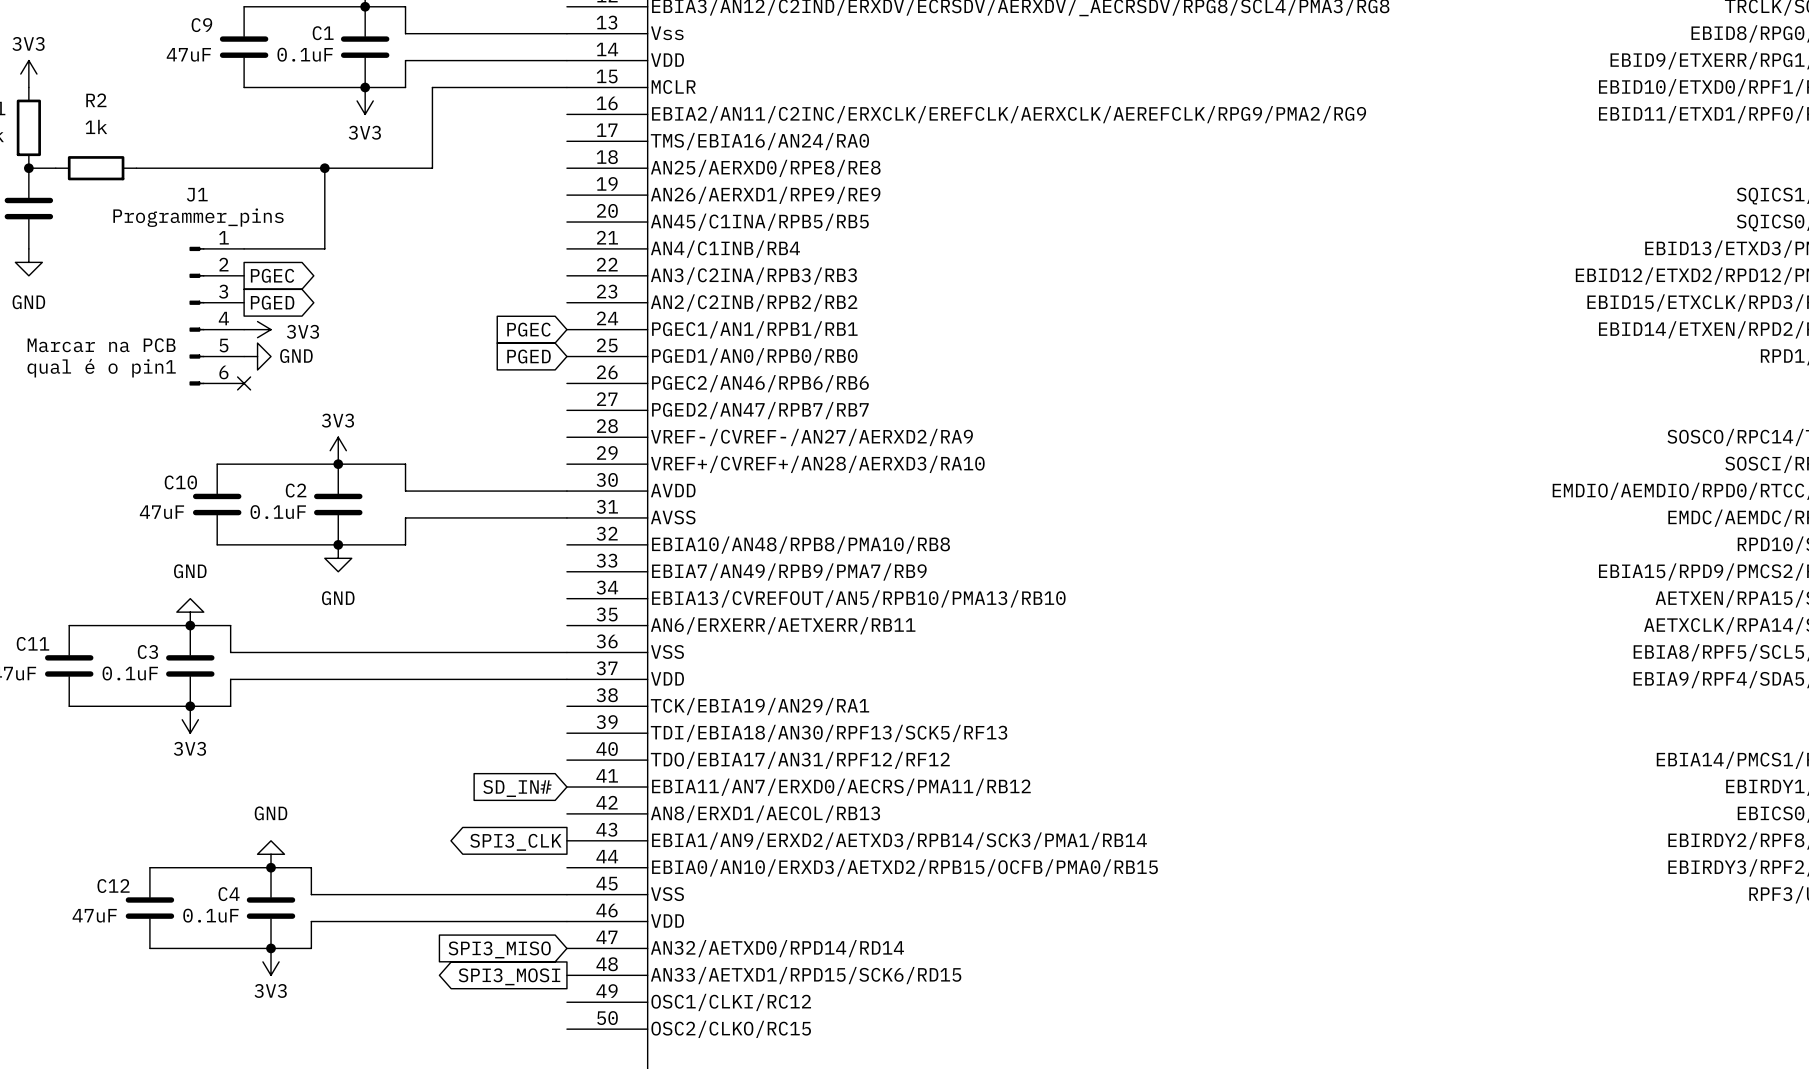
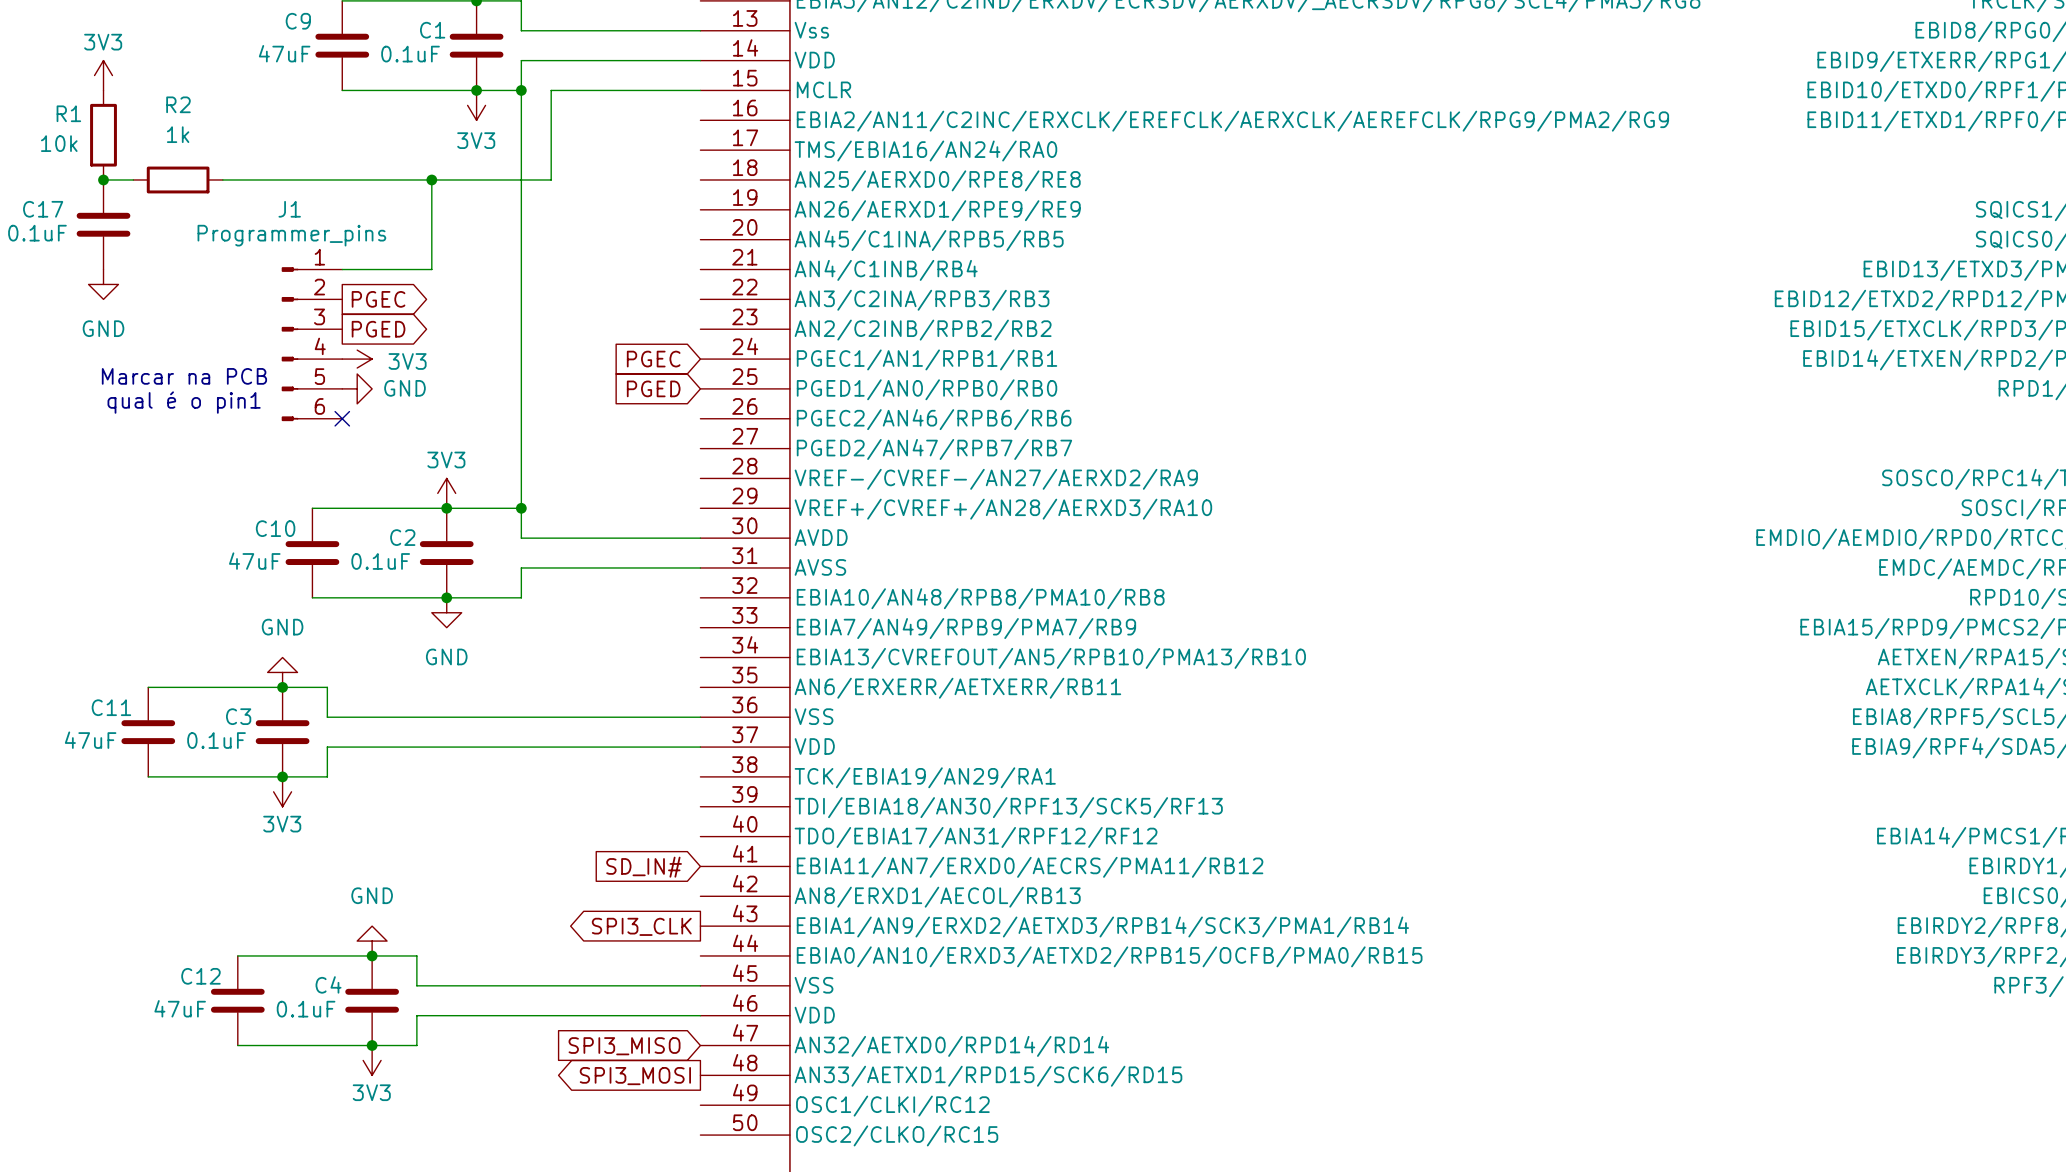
wire: none -> (521, 90) (521, 508)
junction: none -> (521, 90)
junction: none -> (521, 508)

